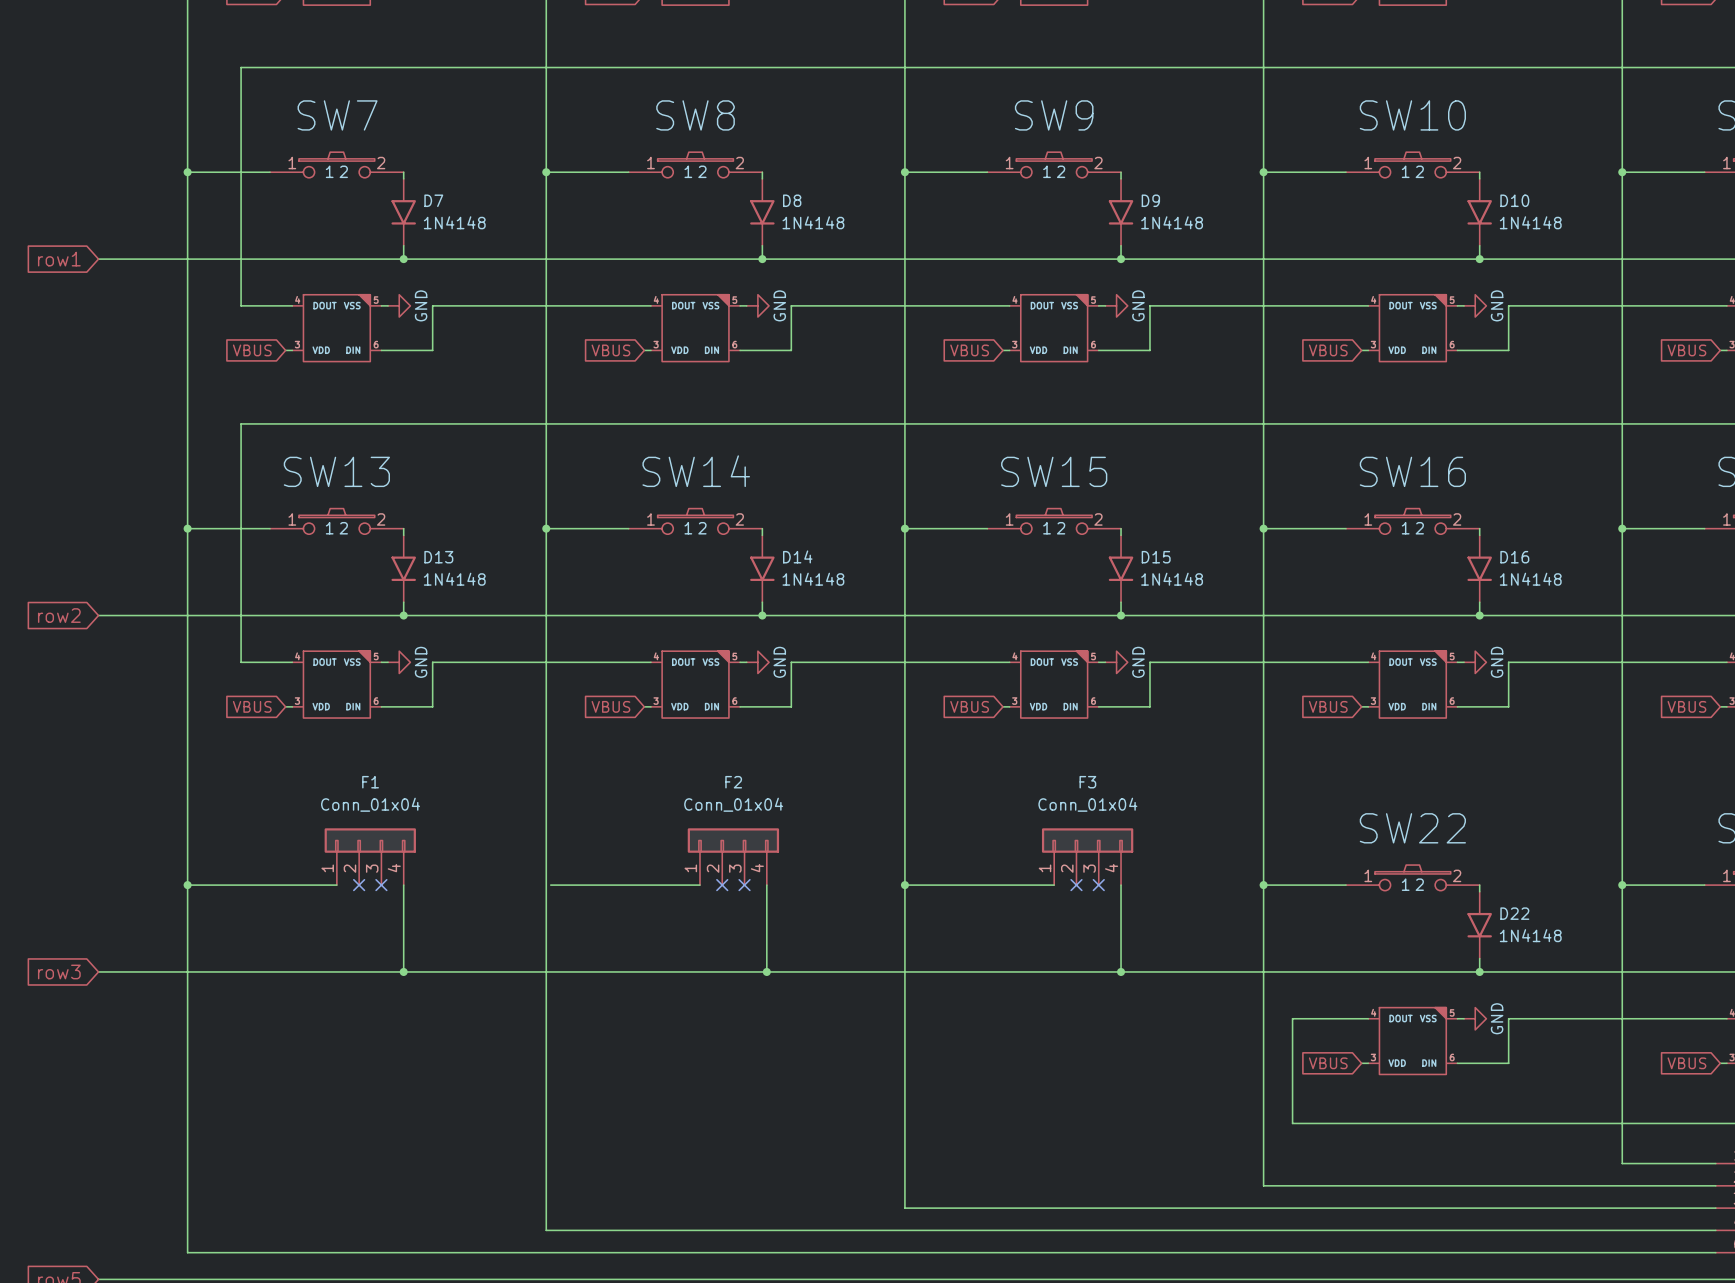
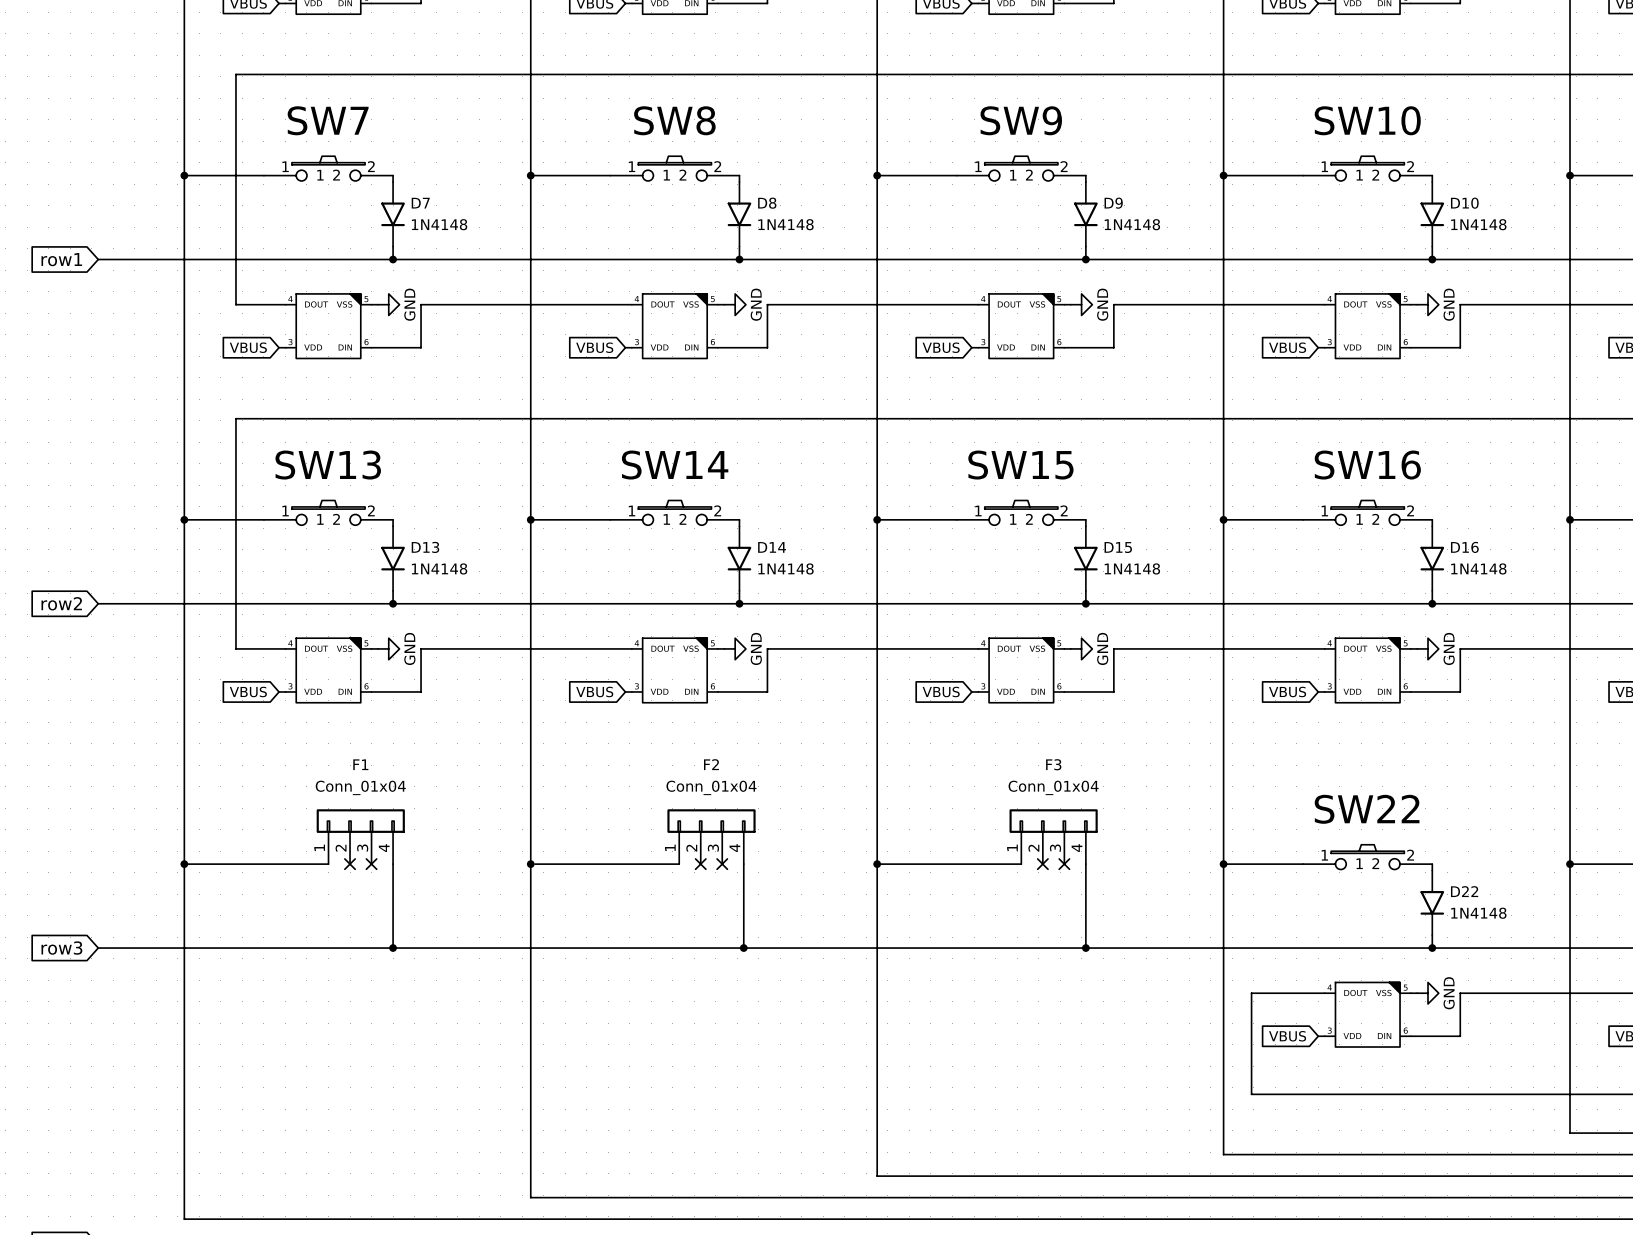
junction: none -> (530, 864)

